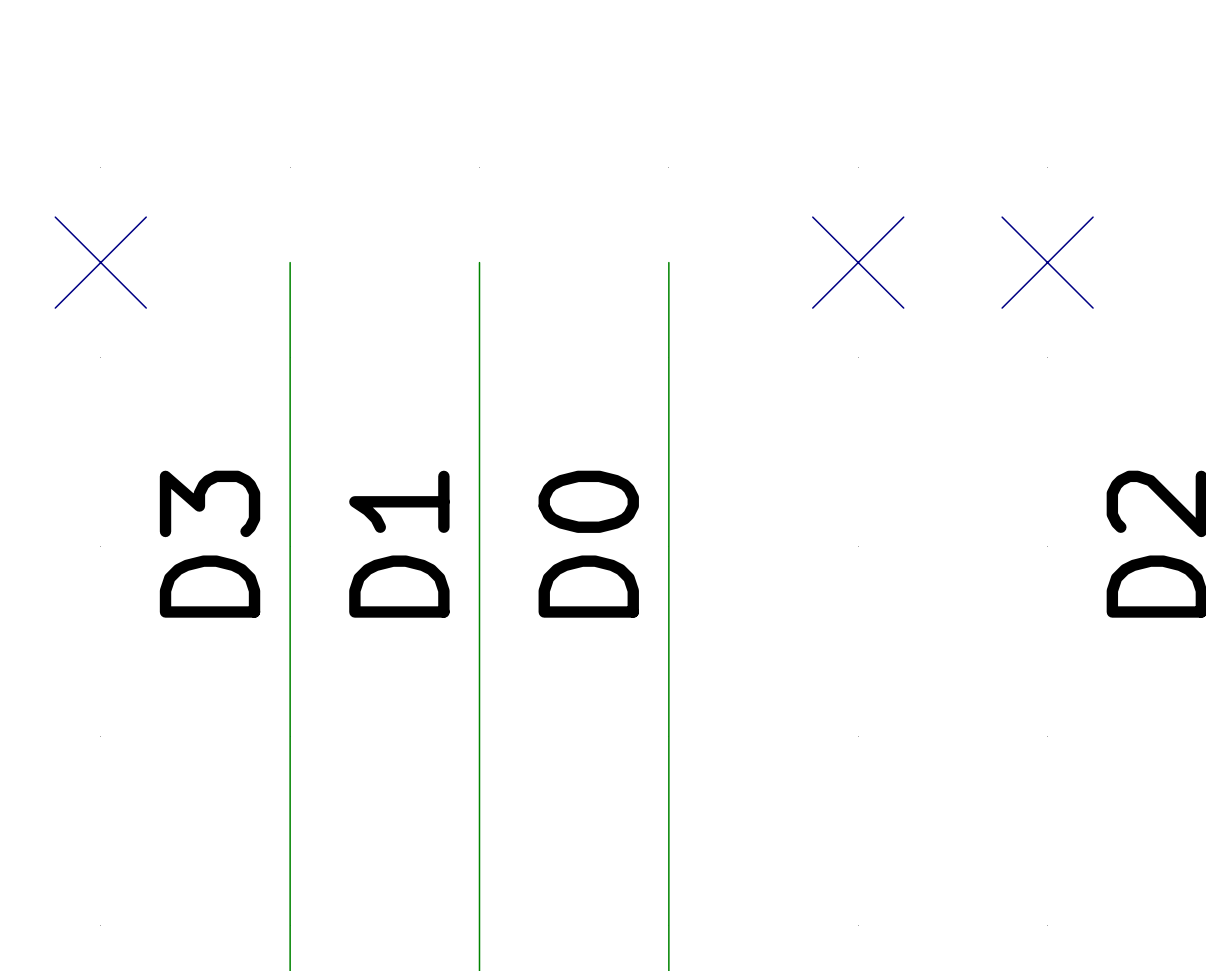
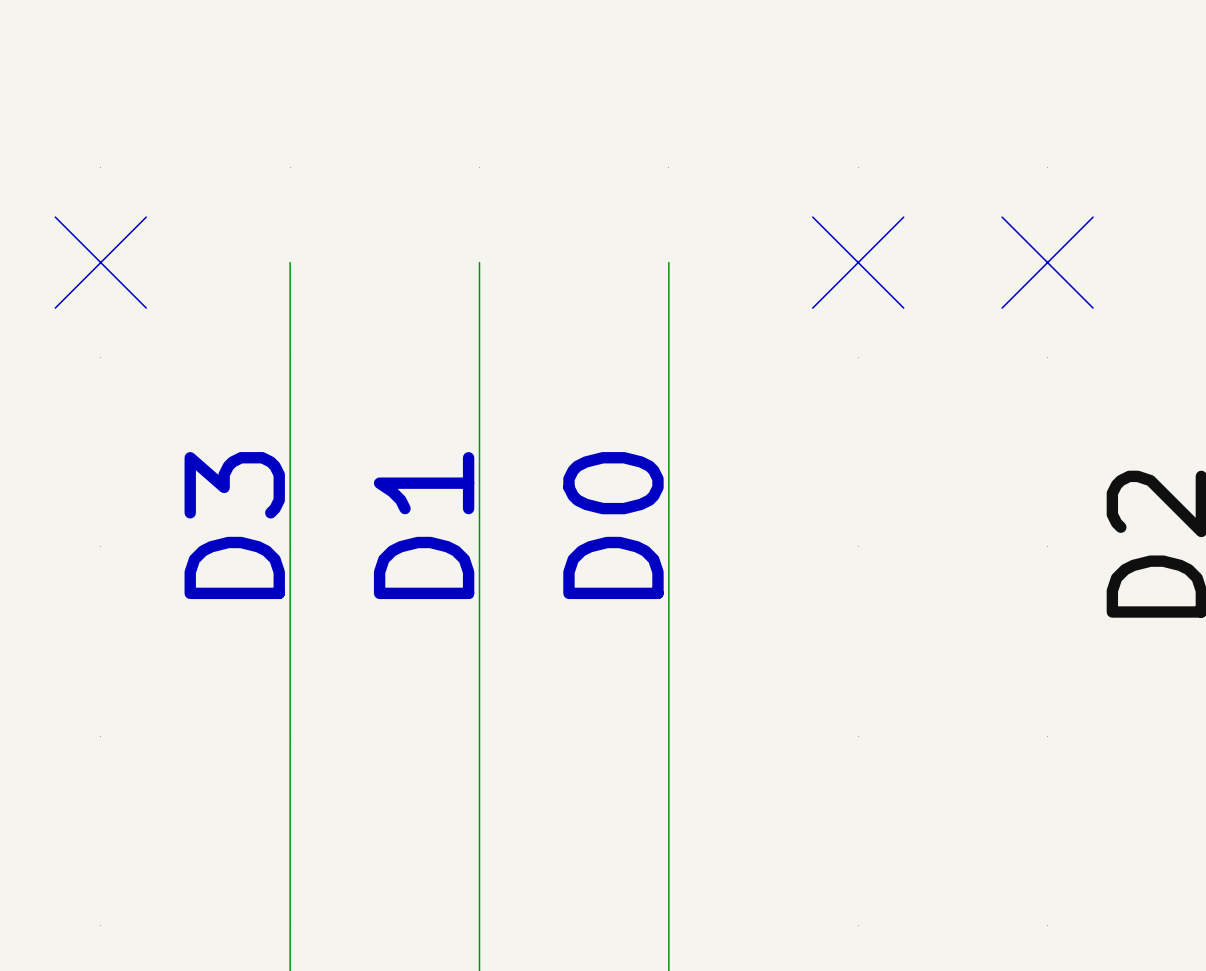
text: none -> D3 (234, 525)
text: none -> D1 (424, 525)
text: none -> D0 (613, 525)
label: D3 (210, 544) -> none
label: D1 (399, 544) -> none
label: D0 (588, 544) -> none

